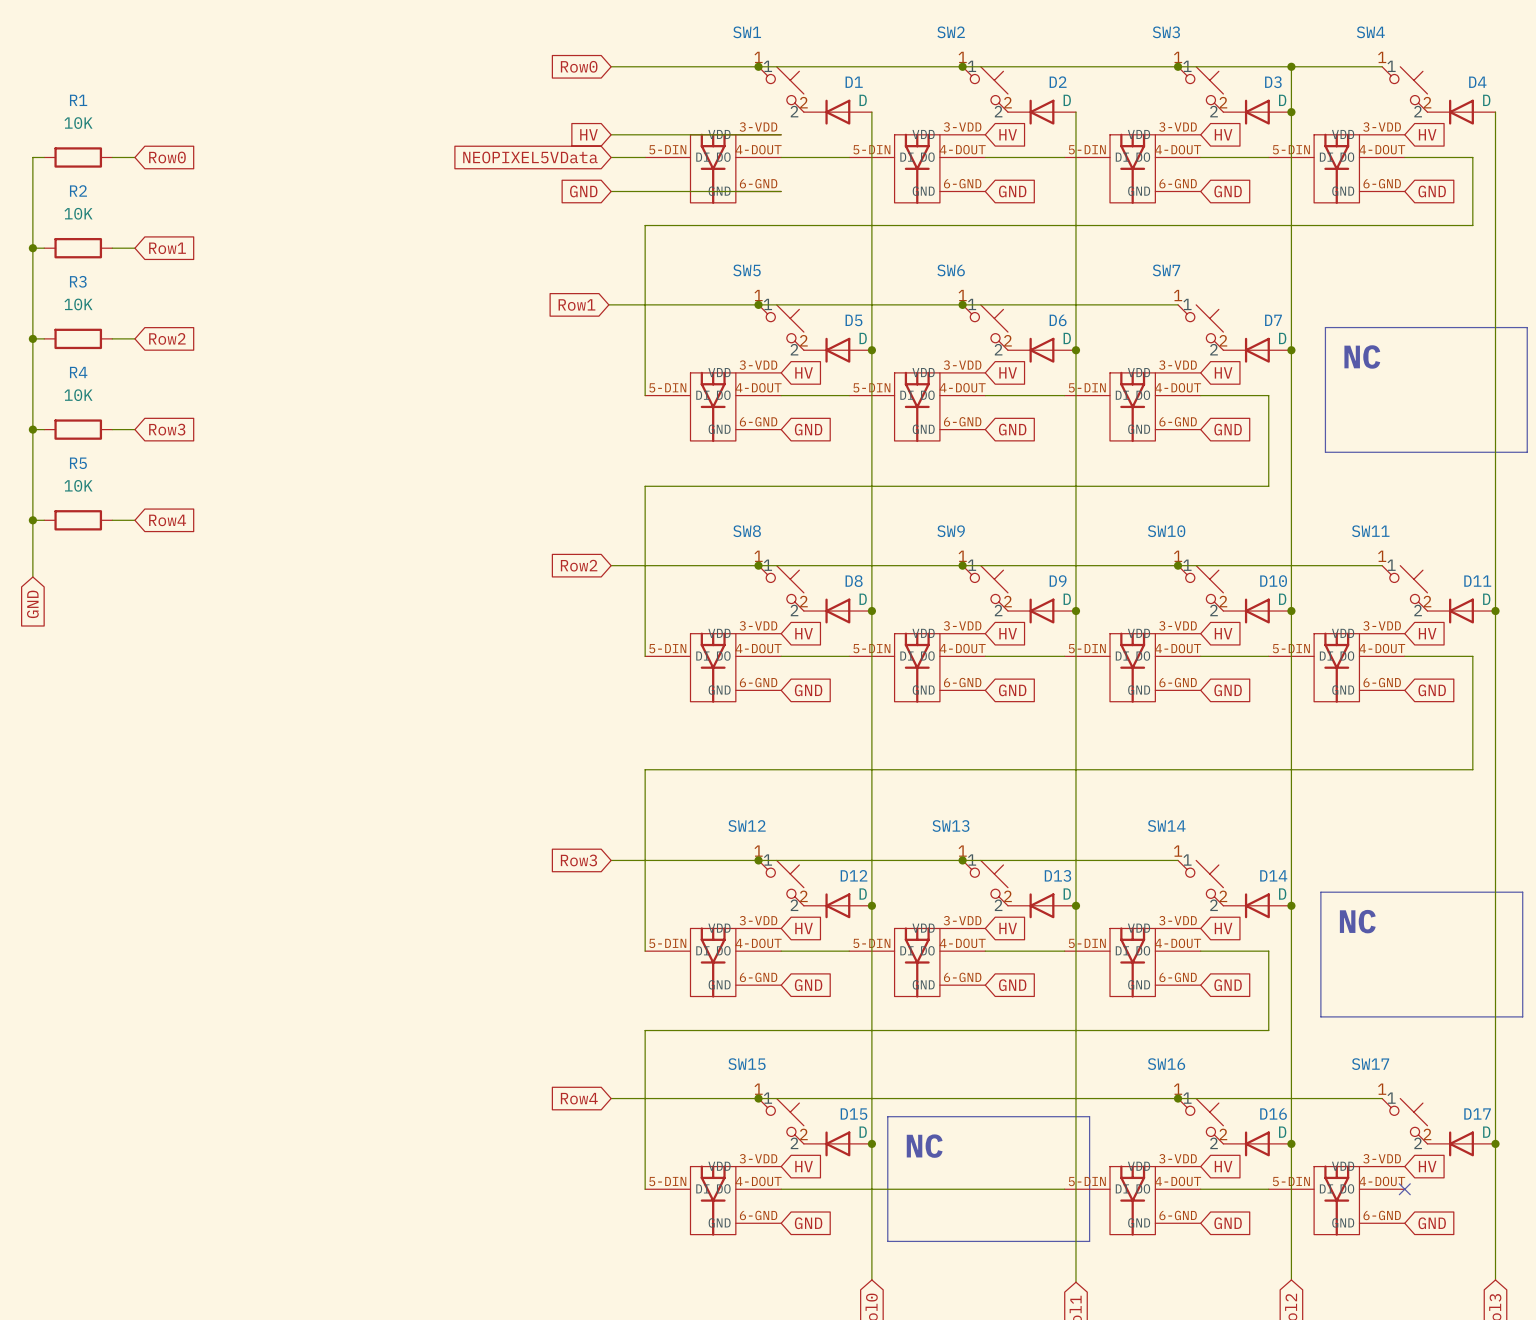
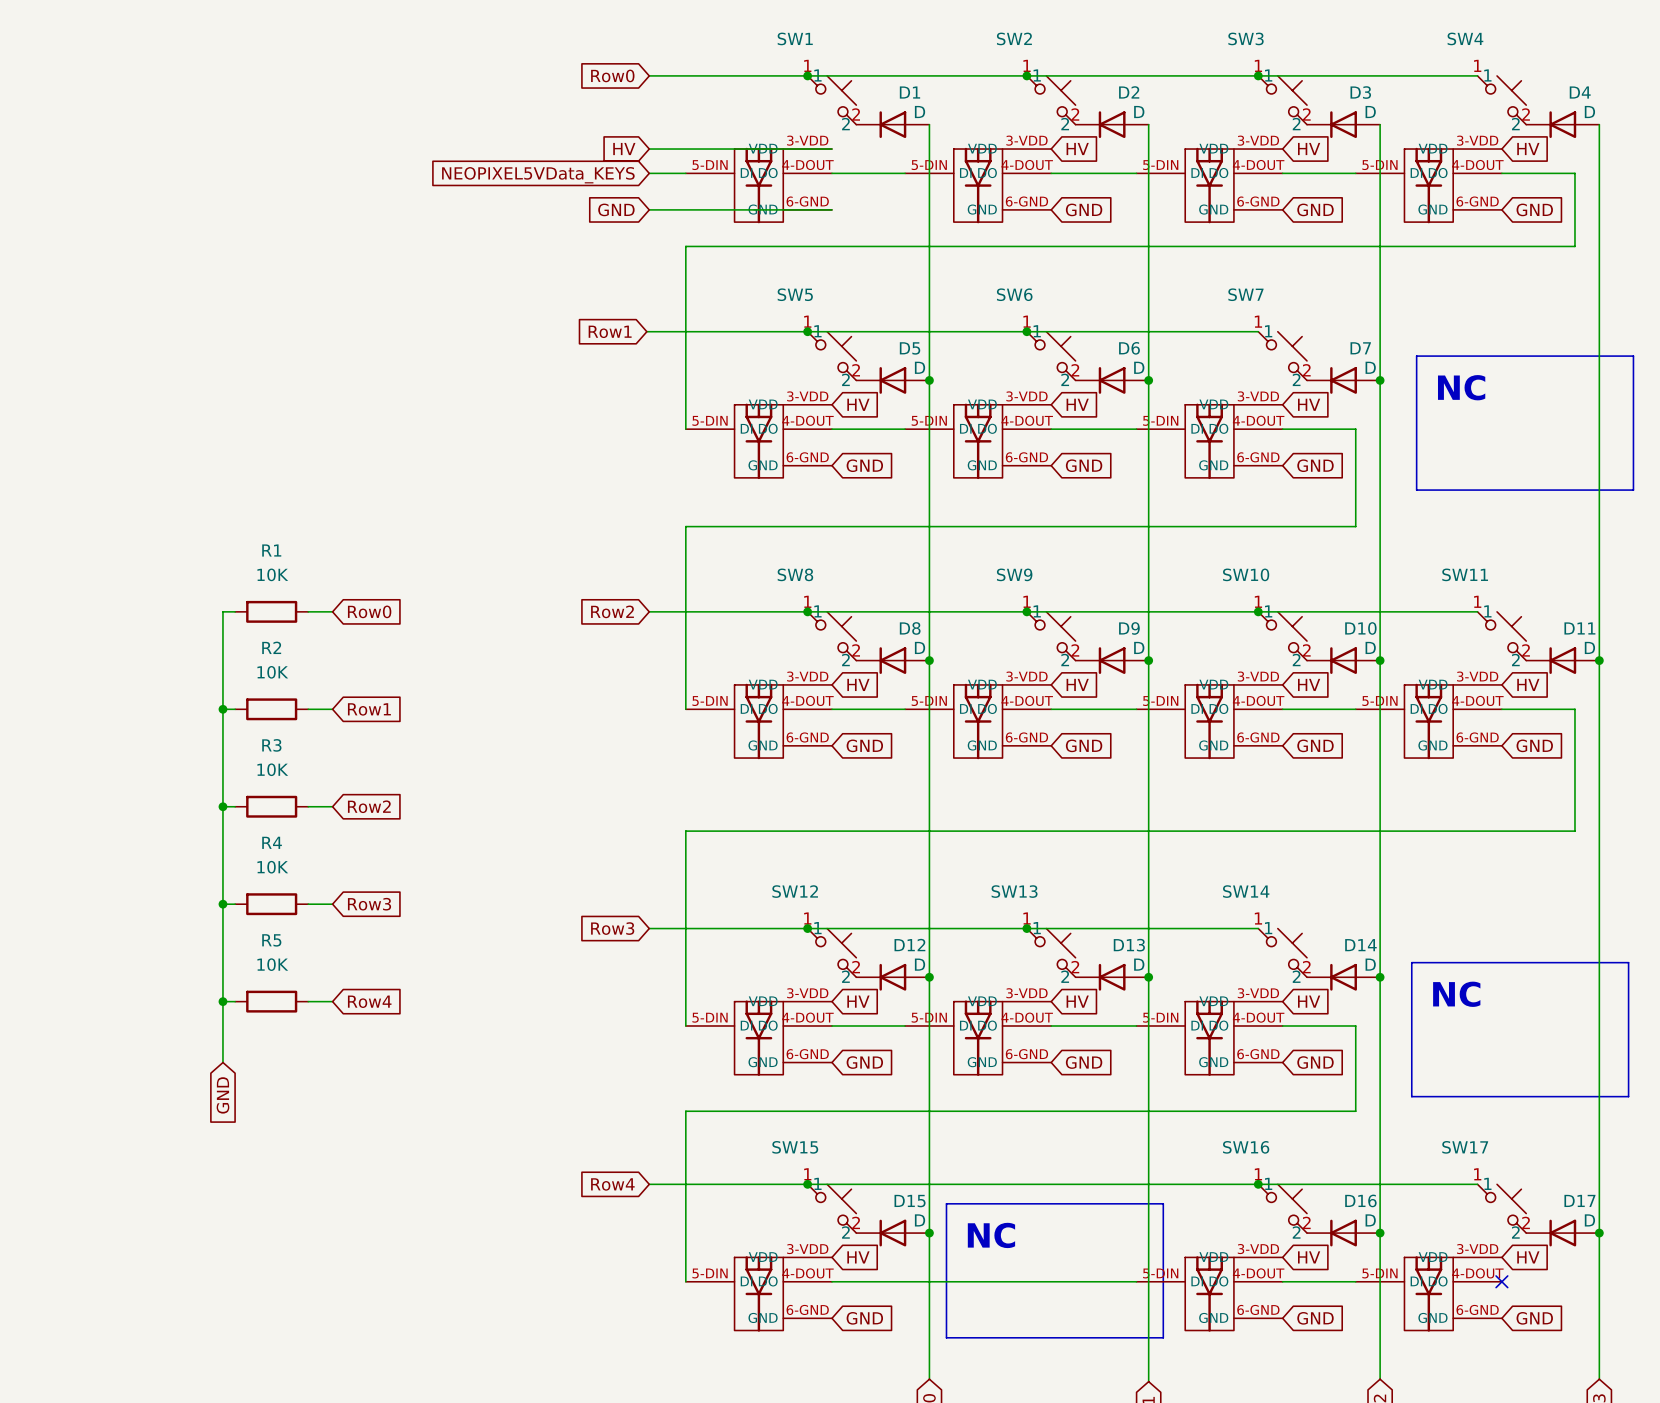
wire: (1291, 66) (1291, 112) -> none
junction: (1291, 66) -> none
junction: (1291, 112) -> none
wire: (44, 157) (32, 157) (32, 576) -> none
R1 position: (78, 157) -> (271, 611)
wire: (112, 157) (134, 157) -> none
global label: Row0 (167, 157) -> none
global label: NEOPIXEL5VData (530, 157) -> NEOPIXEL5VData_KEYS (538, 175)
wire: (32, 248) (44, 248) -> none
junction: (32, 248) -> none
R2 position: (78, 248) -> (271, 709)
wire: (112, 248) (134, 248) -> none
global label: Row1 (167, 248) -> none
wire: (32, 338) (44, 338) -> none
junction: (32, 338) -> none
R3 position: (78, 338) -> (271, 806)
wire: (112, 338) (134, 338) -> none
global label: Row2 (167, 338) -> none
wire: (32, 429) (44, 429) -> none
junction: (32, 429) -> none
R4 position: (78, 429) -> (271, 904)
wire: (112, 429) (134, 429) -> none
global label: Row3 (167, 429) -> none
wire: (32, 520) (44, 520) -> none
junction: (32, 520) -> none
R5 position: (78, 520) -> (271, 1001)
wire: (112, 520) (134, 520) -> (308, 611) (332, 611)
global label: Row4 (167, 520) -> none
wire: none -> (235, 611) (222, 611) (222, 1062)
global label: none -> Row0 (369, 611)
global label: GND (32, 604) -> none
wire: none -> (222, 709) (235, 709)
junction: none -> (222, 709)
wire: none -> (308, 709) (332, 709)
global label: none -> Row1 (369, 709)
wire: none -> (222, 806) (235, 806)
junction: none -> (222, 806)
wire: none -> (308, 806) (332, 806)
global label: none -> Row2 (369, 806)
wire: none -> (222, 904) (235, 904)
junction: none -> (222, 904)
wire: none -> (308, 904) (332, 904)
global label: none -> Row3 (369, 904)
wire: none -> (222, 1001) (235, 1001)
junction: none -> (222, 1001)
wire: none -> (308, 1001) (332, 1001)
global label: none -> Row4 (369, 1001)
global label: none -> GND (222, 1095)

